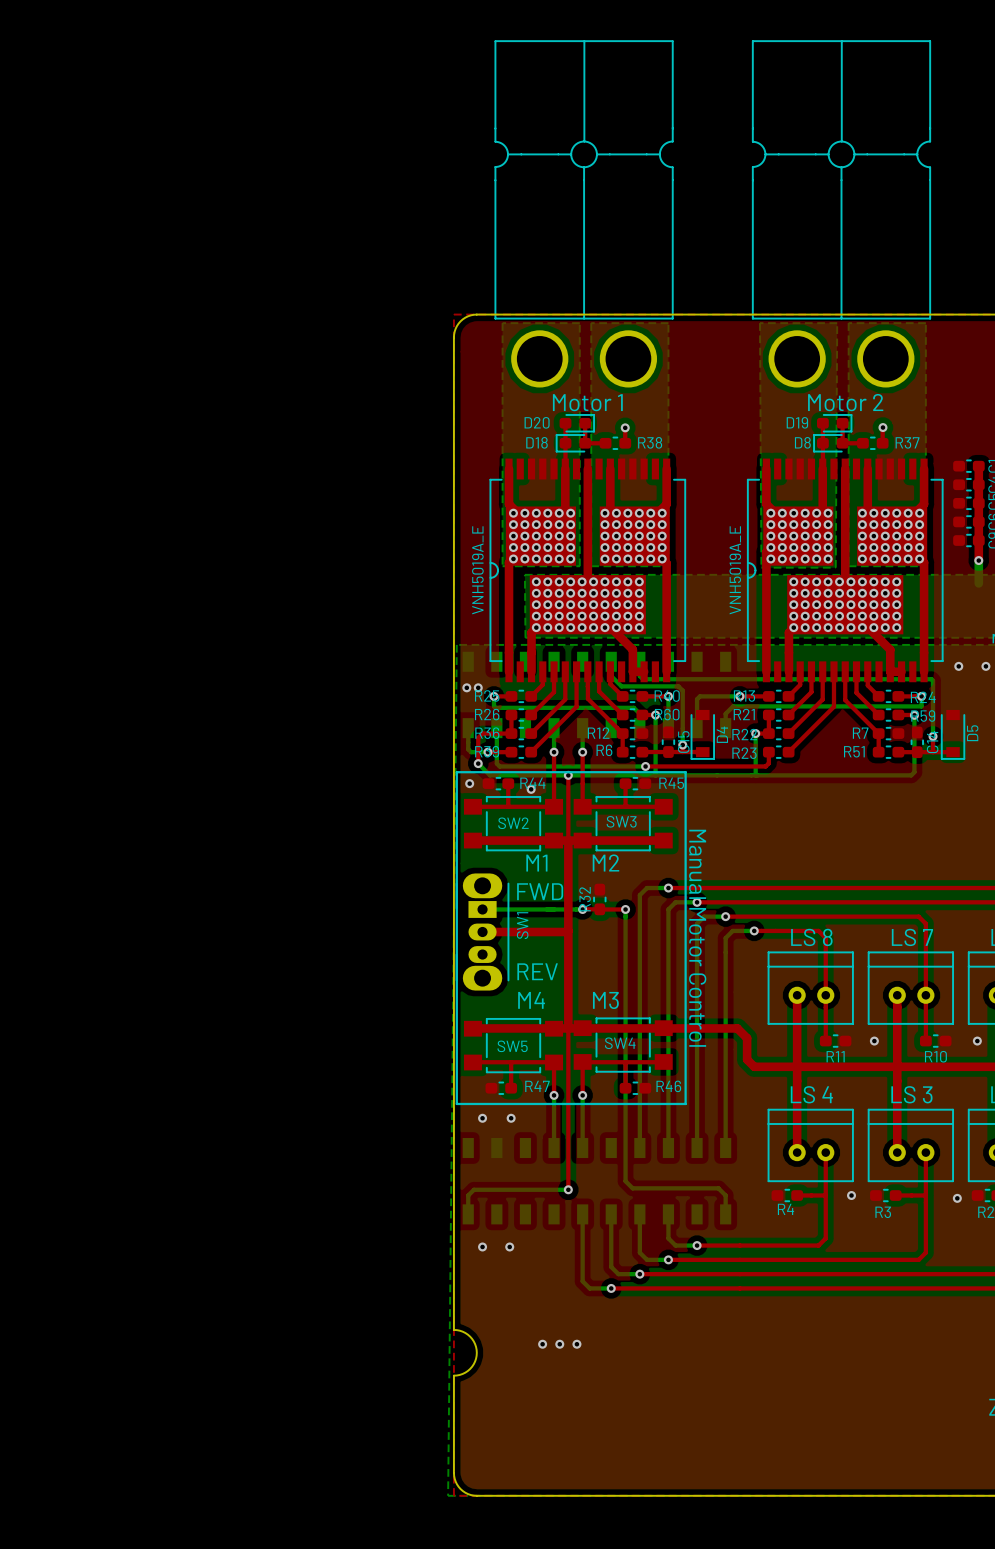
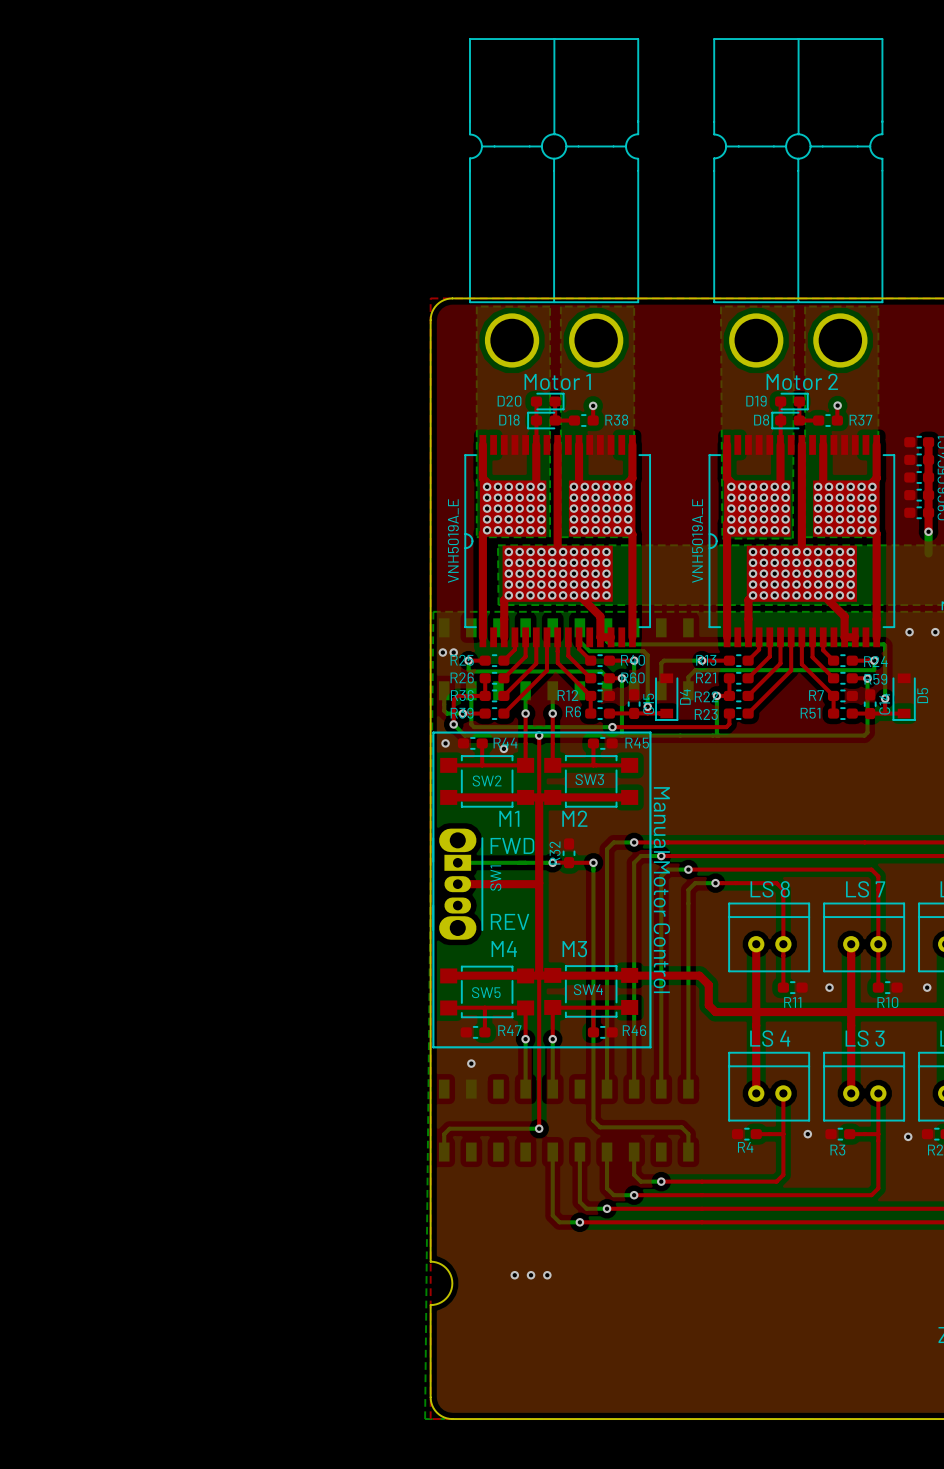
via: (482, 1118) -> none
via: (511, 1118) -> none
via: none -> (471, 1063)
via: (482, 1246) -> none
via: (509, 1246) -> none

